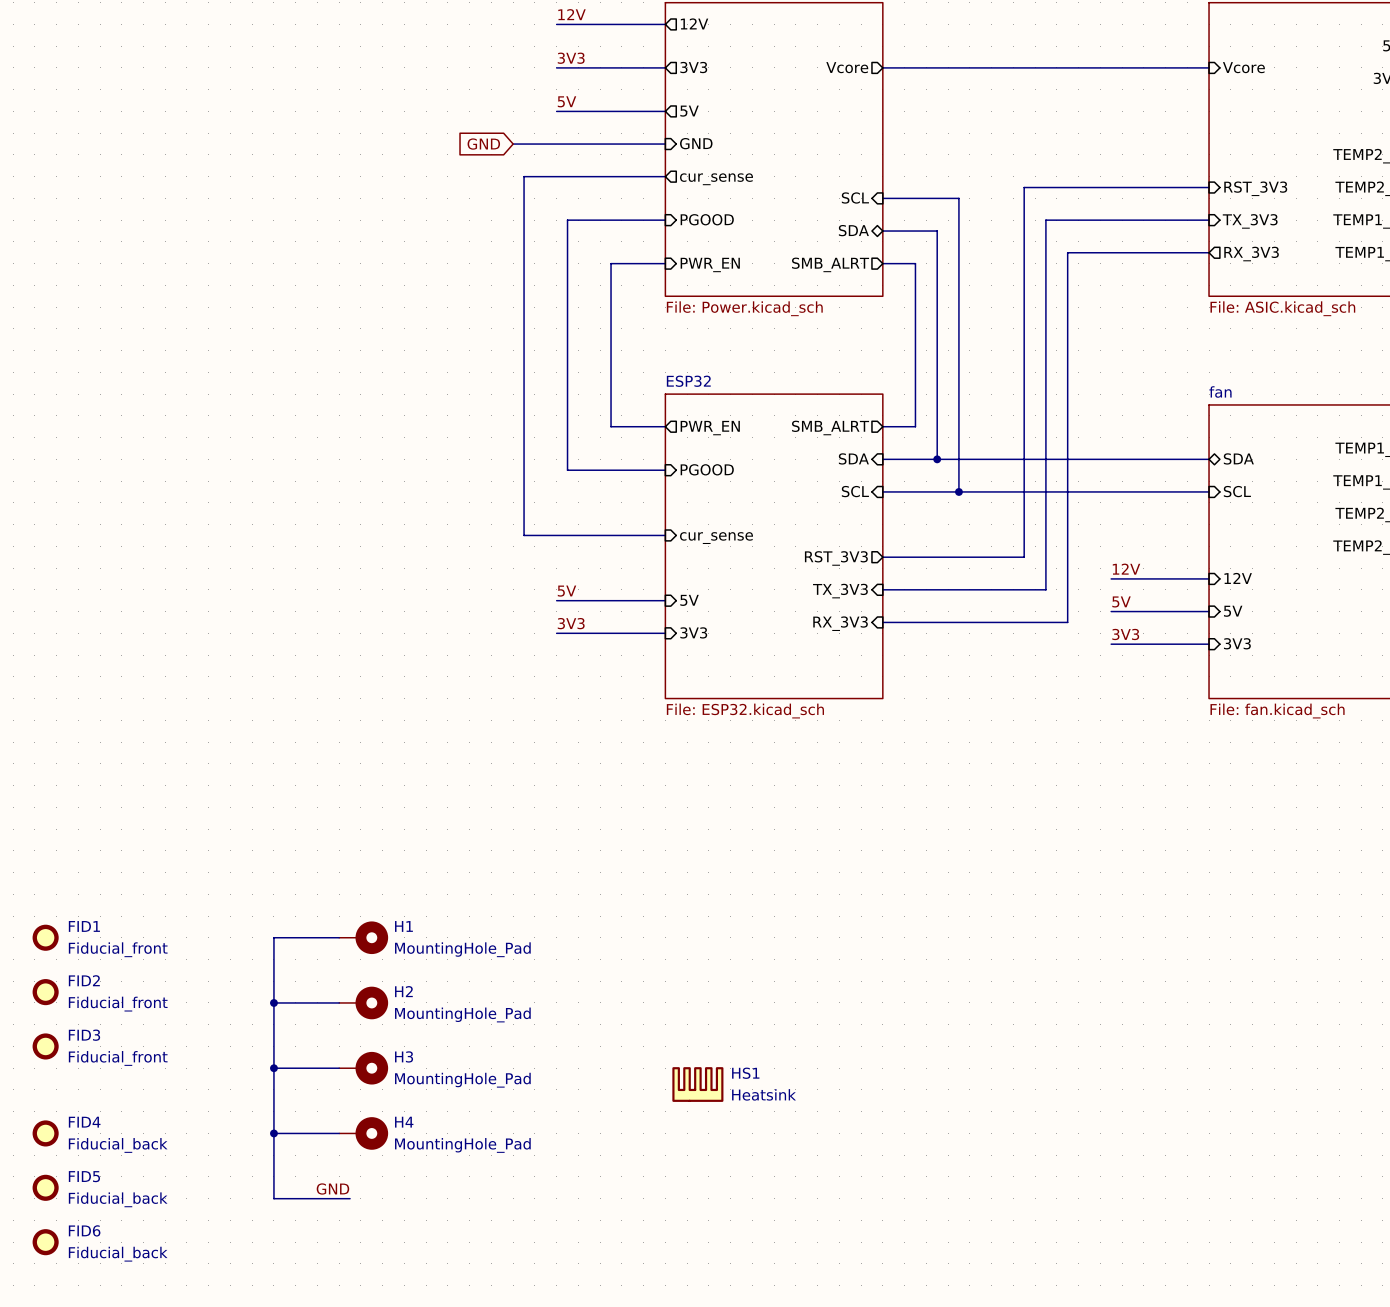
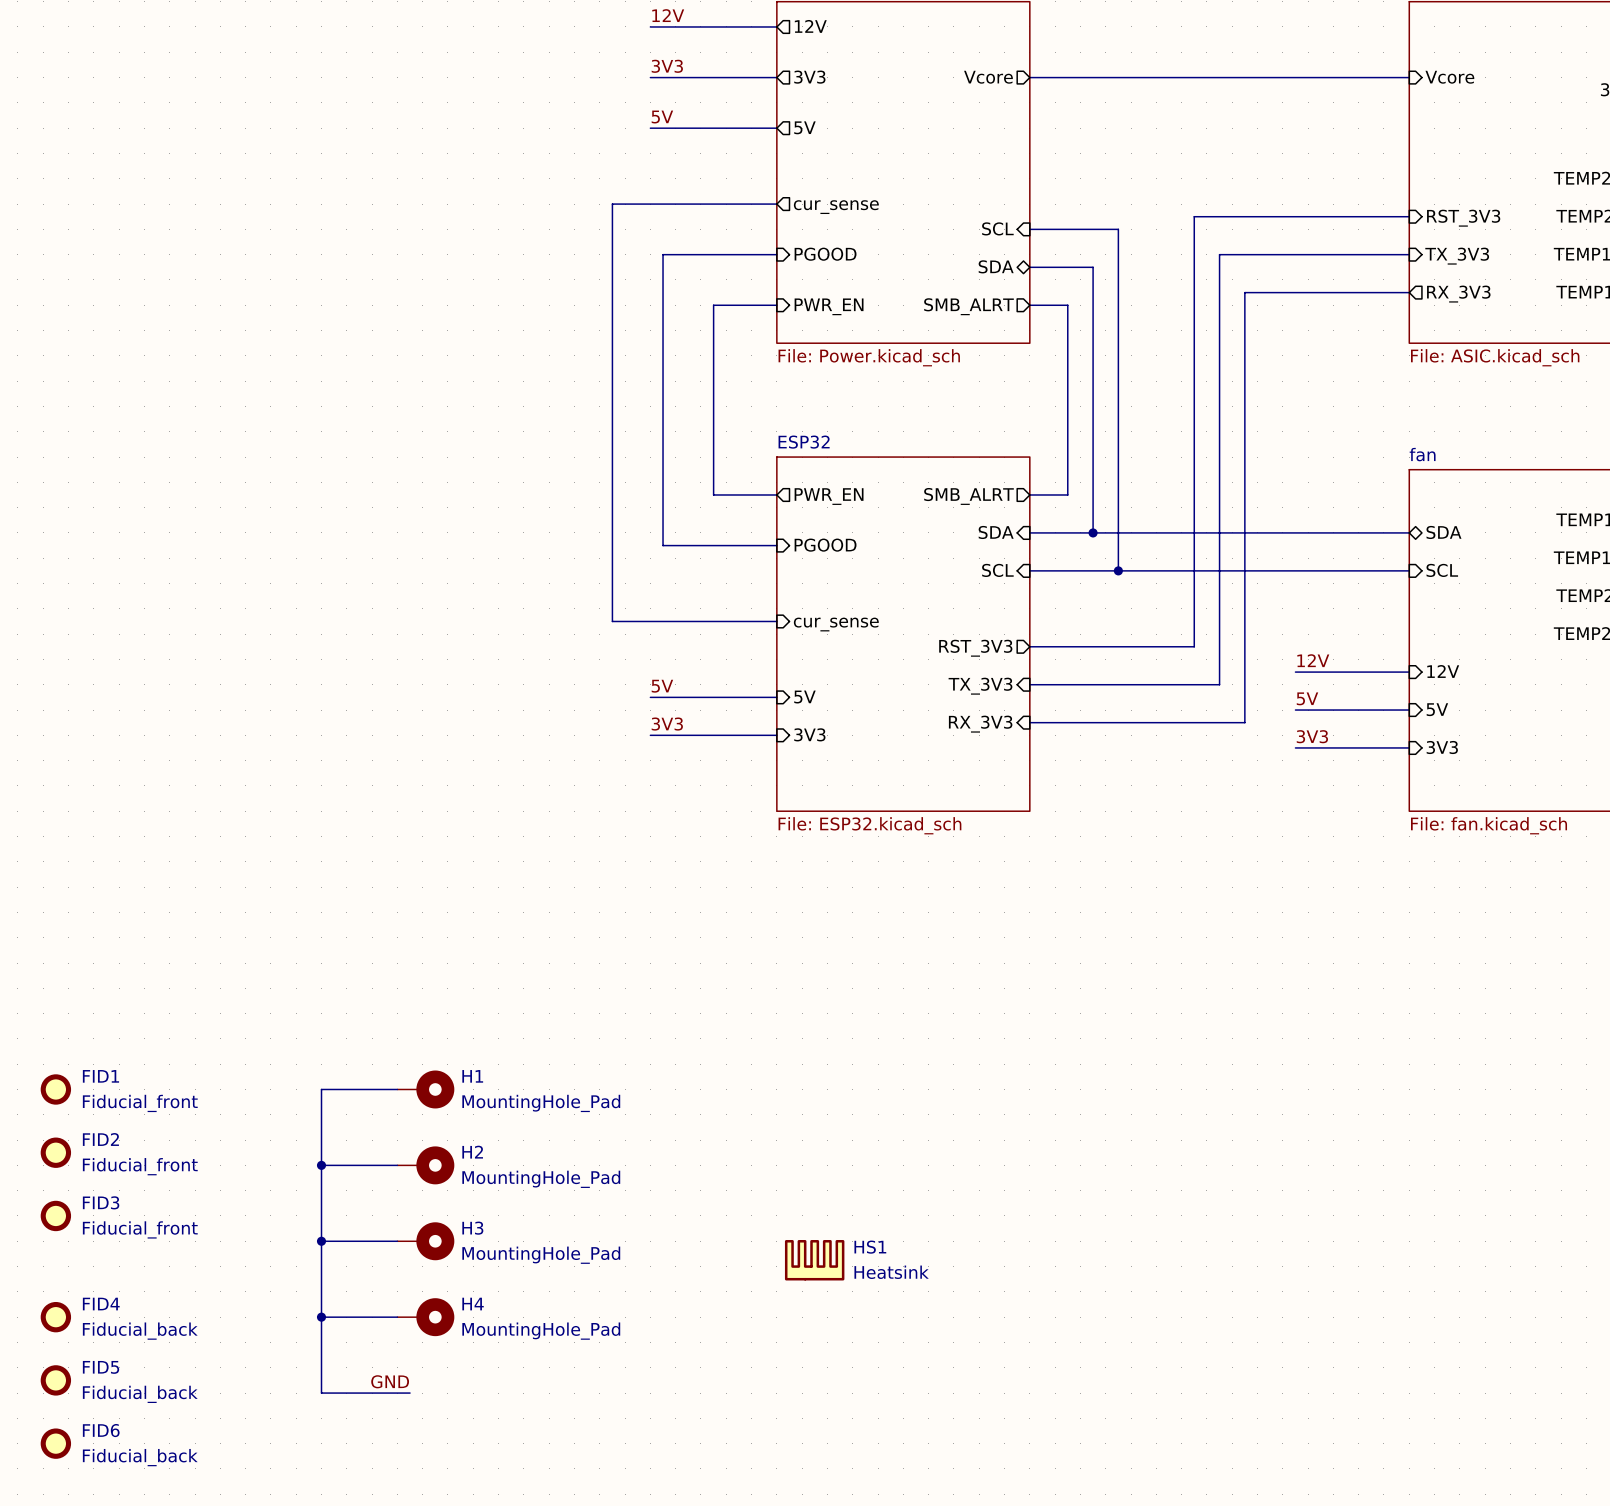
sheet pin: GND (696, 143) -> none
global label: GND (483, 144) -> none
wire: (513, 144) (665, 144) -> none

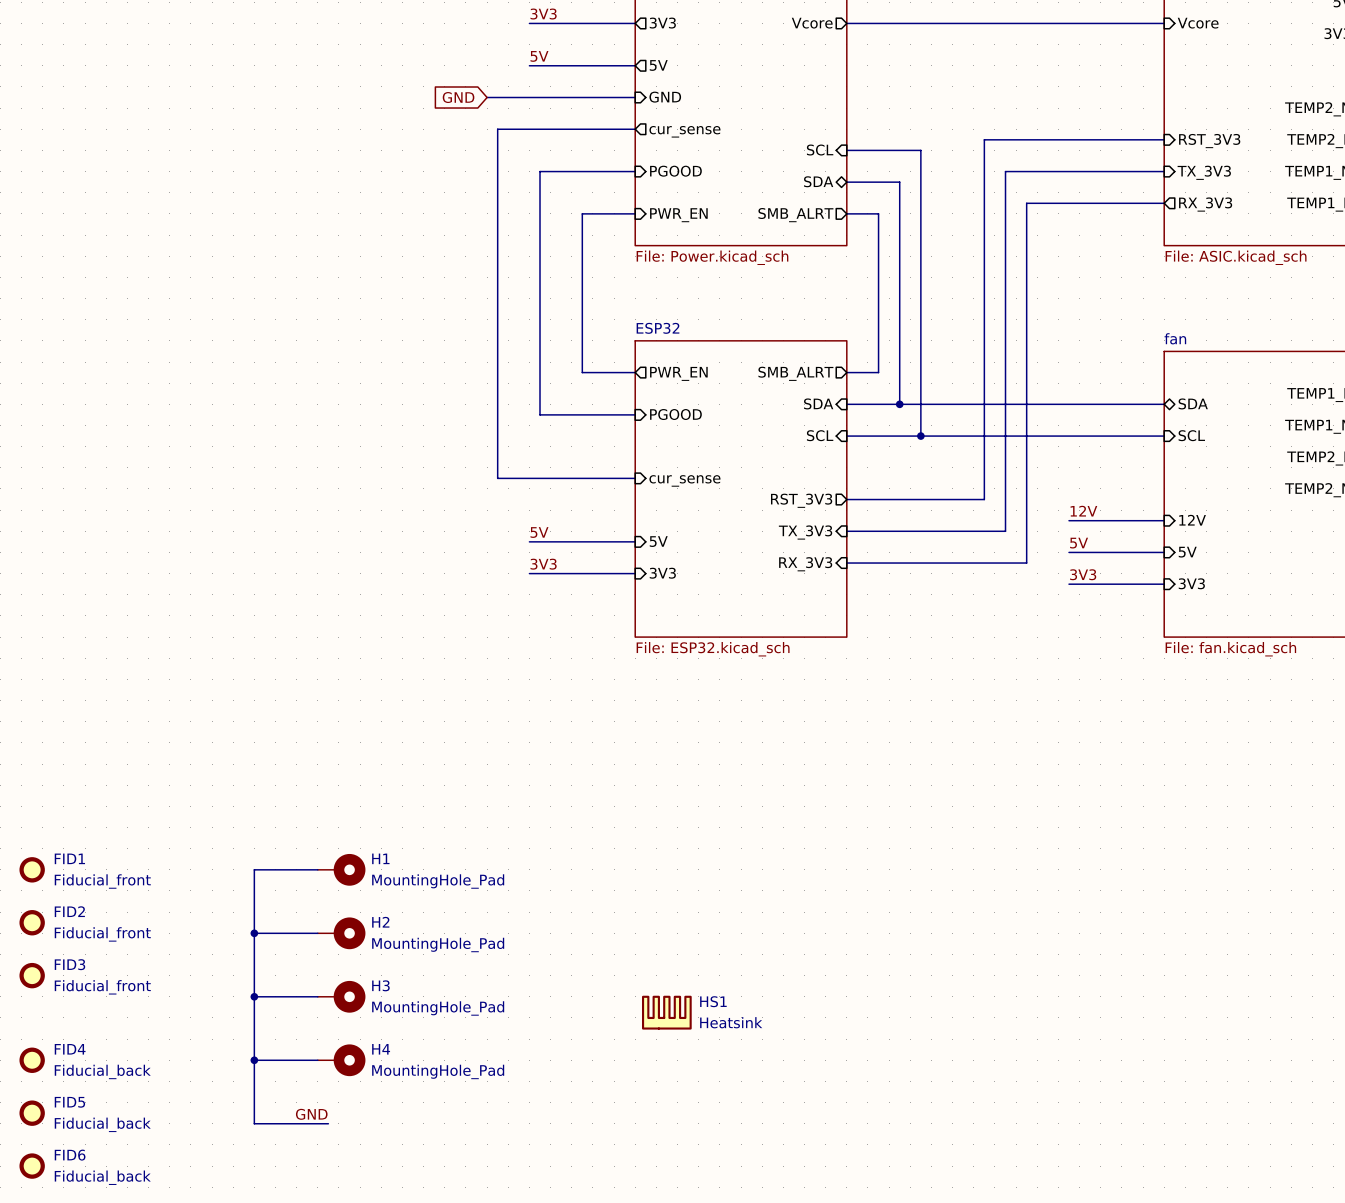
sheet pin: none -> GND (665, 97)
global label: none -> GND (458, 97)
wire: none -> (487, 97) (635, 97)

